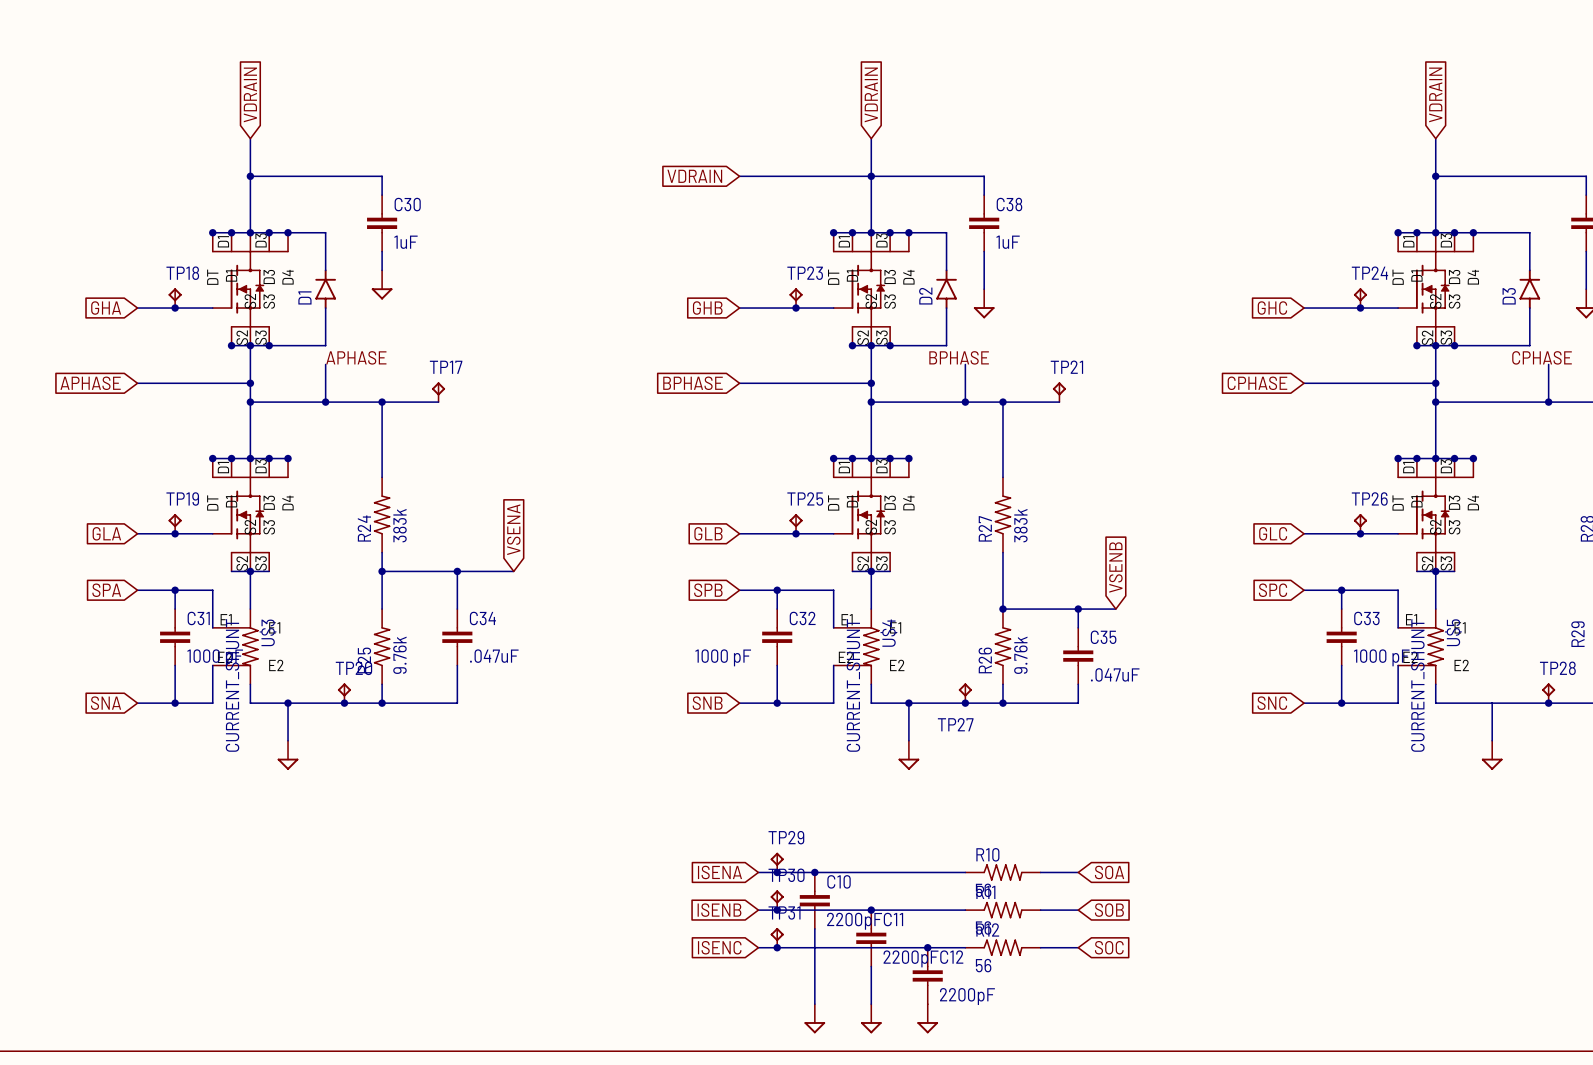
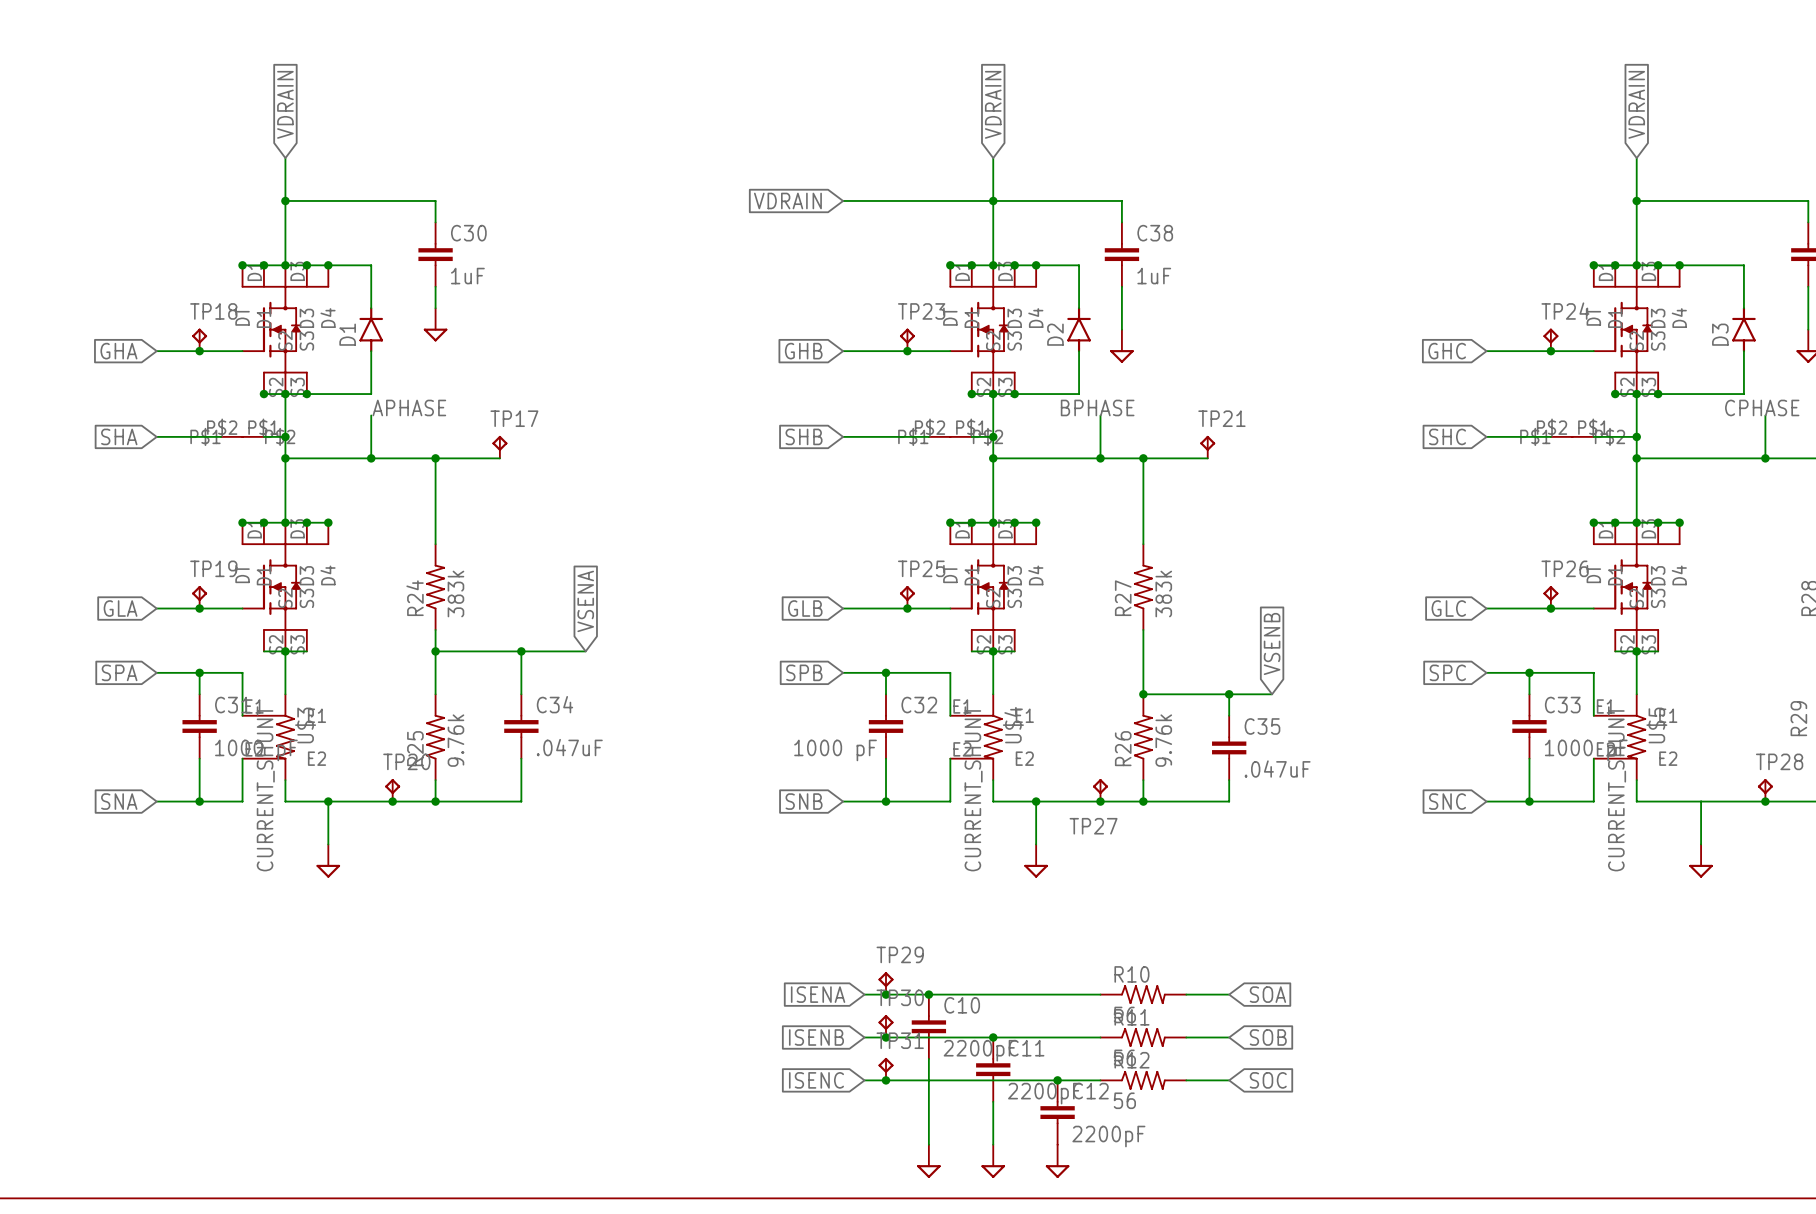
global label: APHASE (90, 383) -> SHA (119, 436)
part: none -> (242, 436)
global label: BPHASE (693, 383) -> SHB (804, 436)
part: none -> (950, 436)
global label: CPHASE (1257, 383) -> SHC (1447, 436)
part: none -> (1572, 436)

